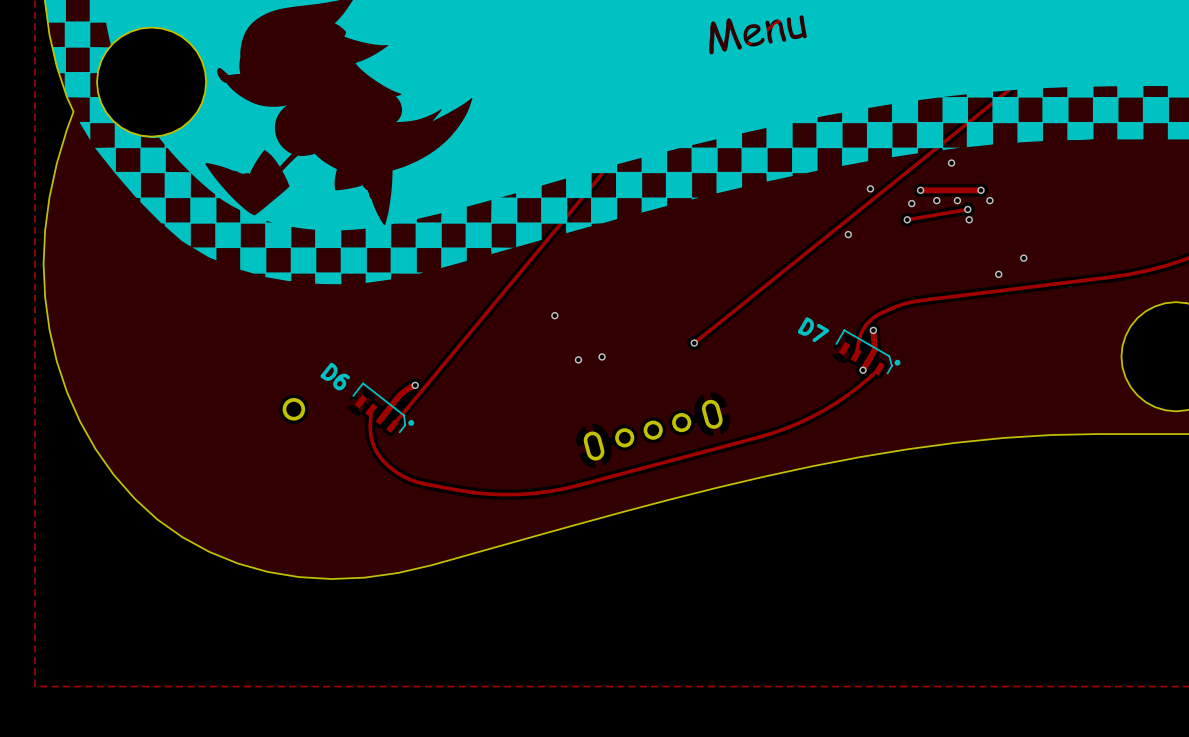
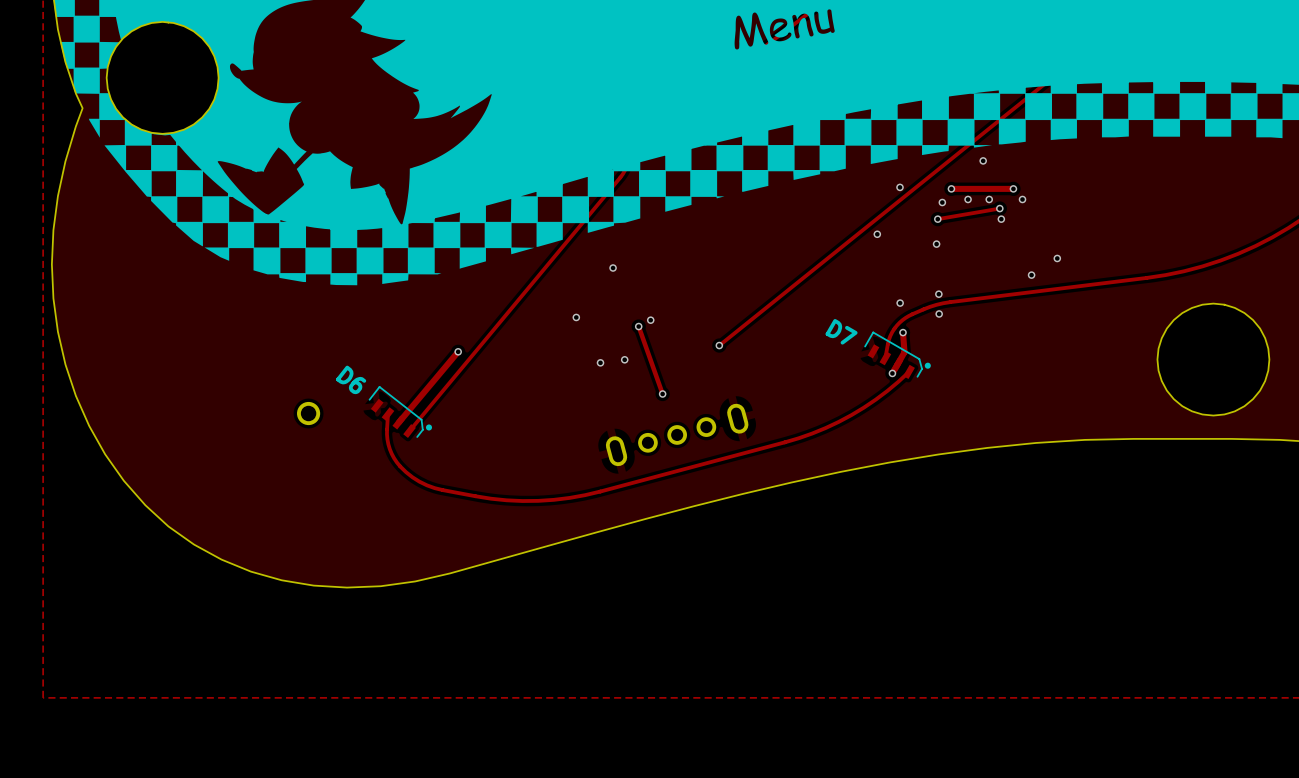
via: none -> (936, 244)
via: none -> (613, 268)
via: none -> (938, 294)
via: none -> (900, 303)
via: none -> (939, 313)
via: none -> (650, 320)
track: none -> (638, 326) (662, 394)
via: none -> (638, 326)
track: (415, 385) (400, 394) (381, 418) -> (458, 351) (398, 422)
via position: (415, 385) -> (458, 351)
via: none -> (662, 394)

